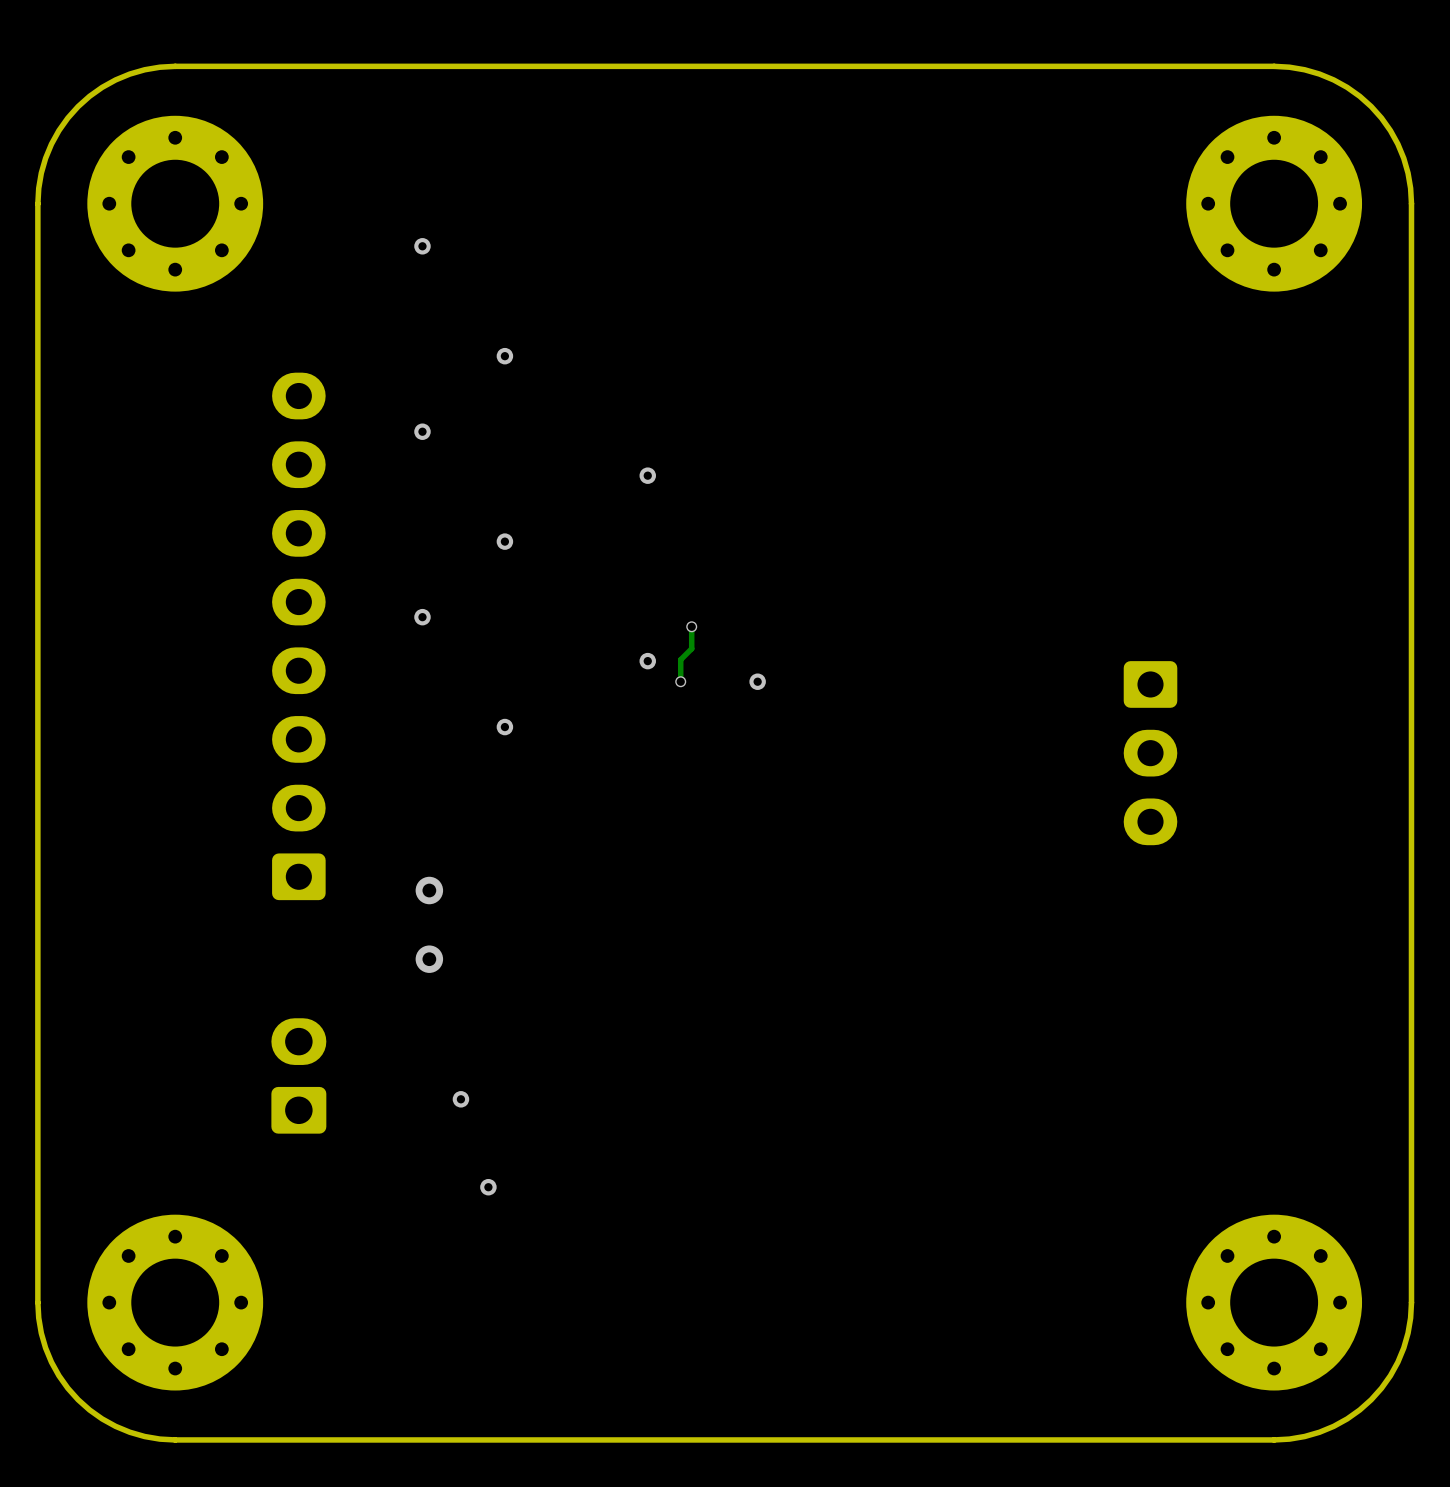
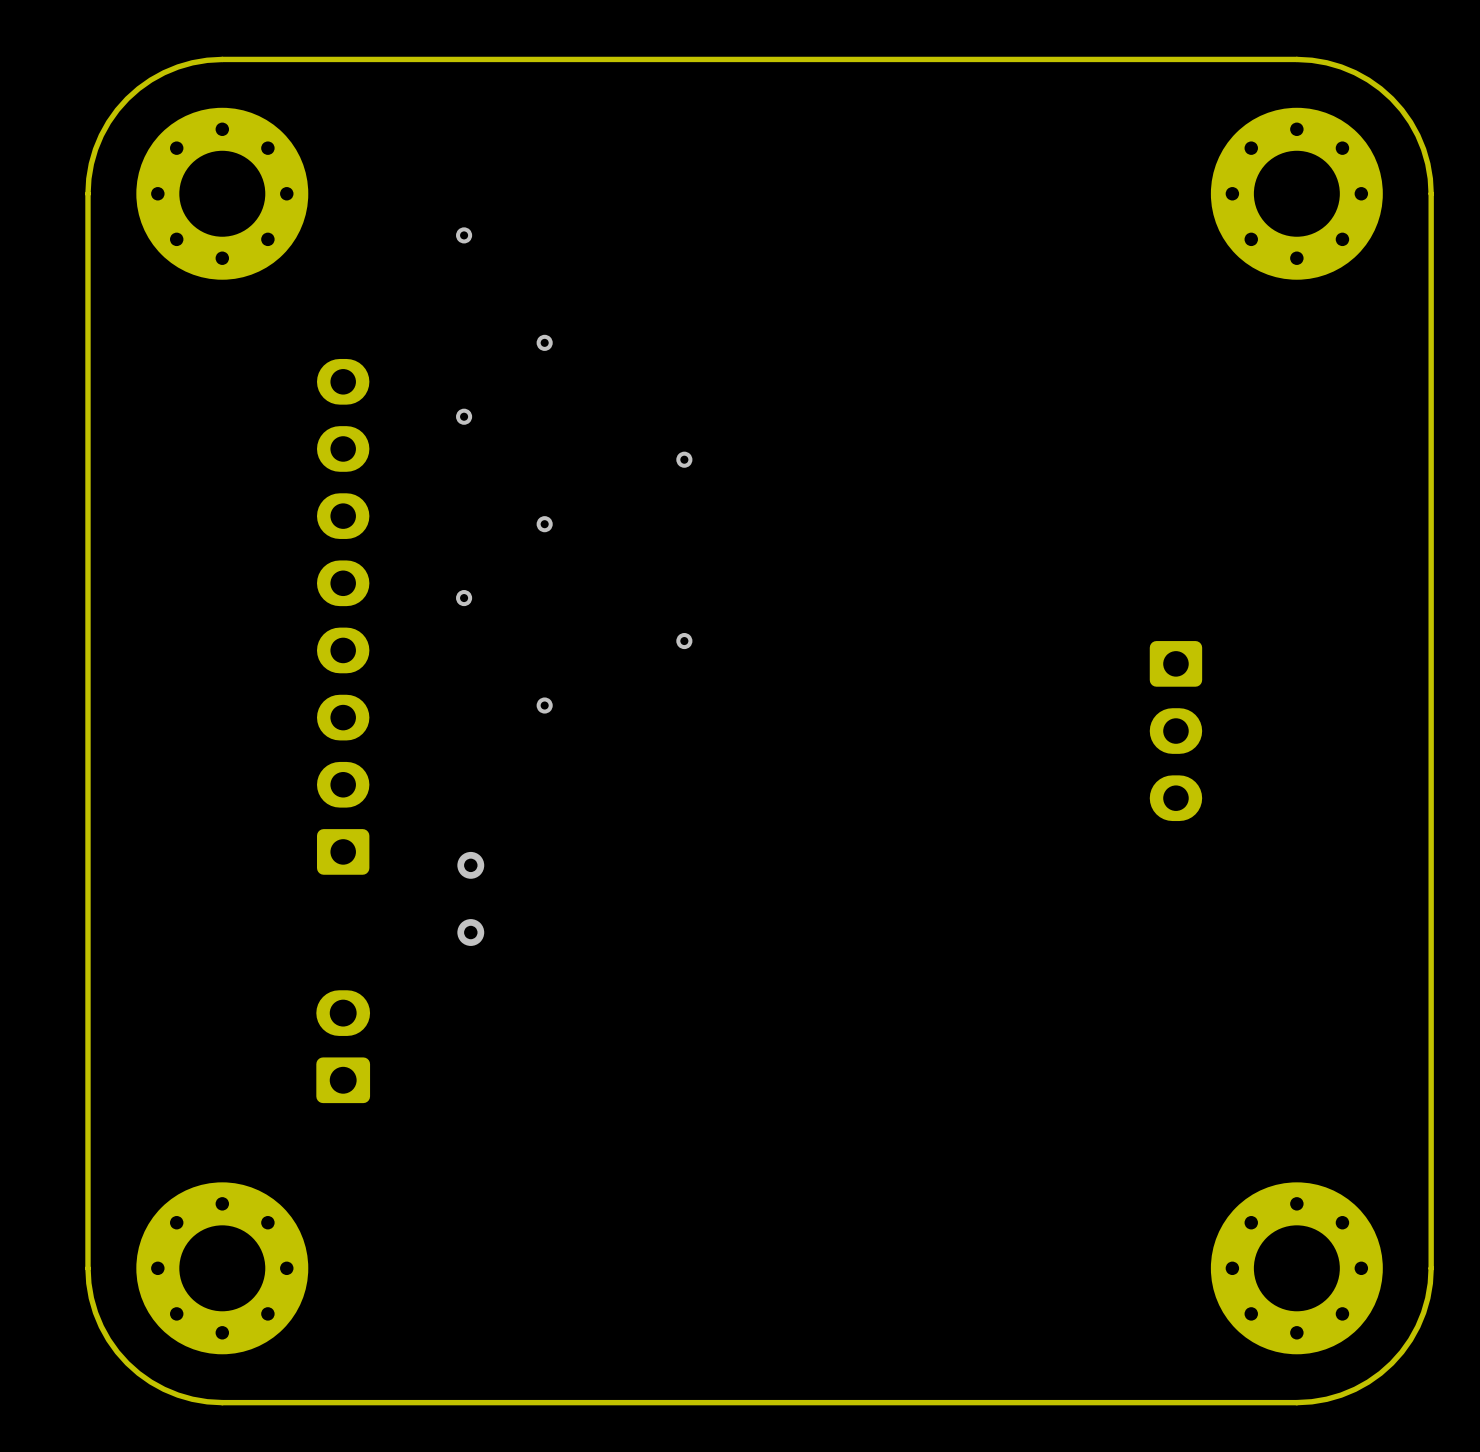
track: (691, 626) (691, 648) (680, 659) (680, 681) -> none
via: (691, 626) -> none
via: (680, 681) -> none
via: (757, 681) -> none
via: (460, 1099) -> none
via: (488, 1187) -> none

